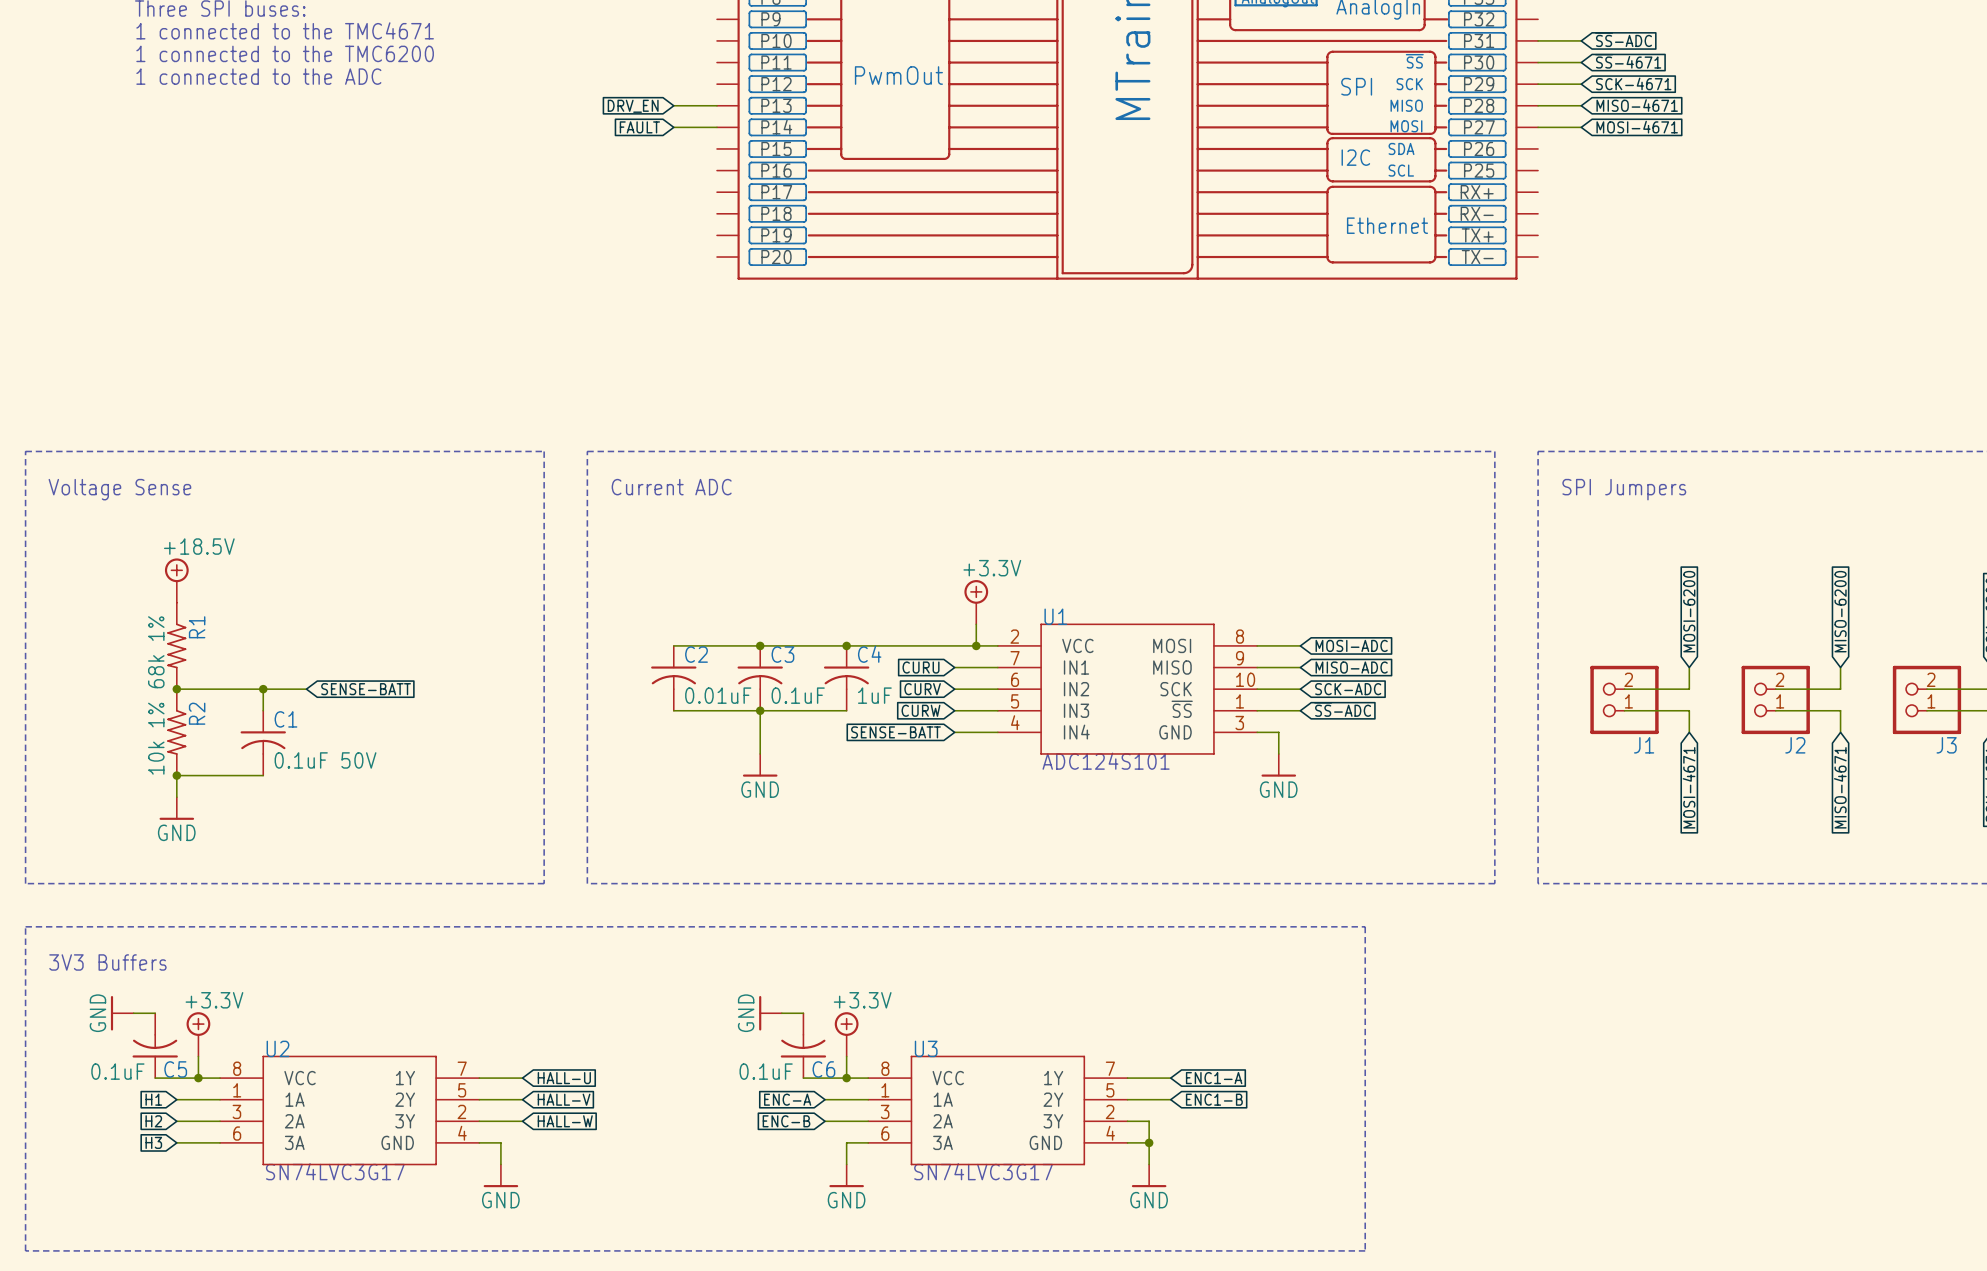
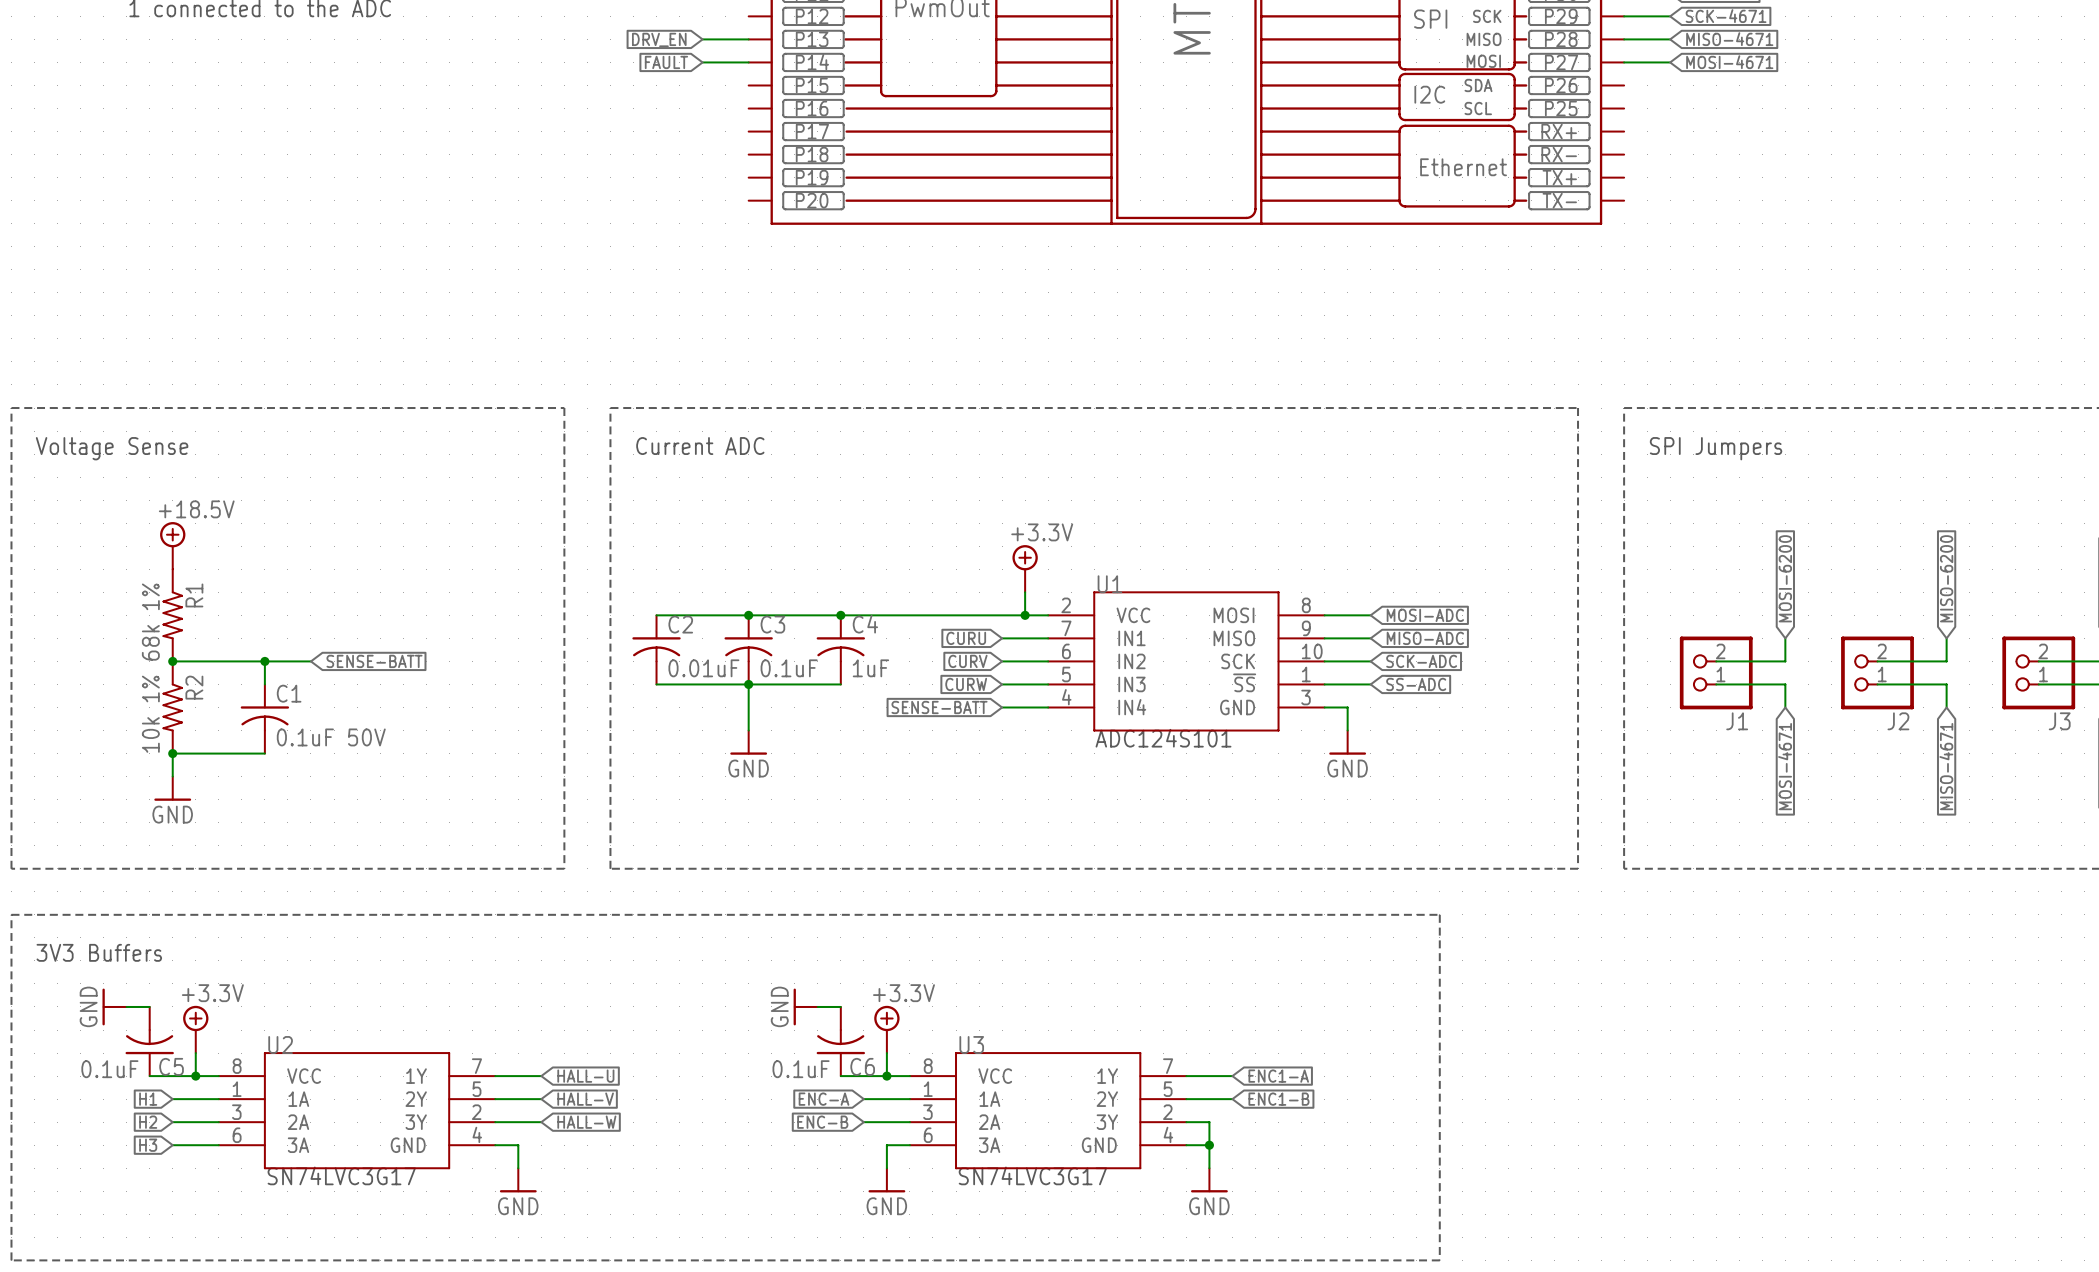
wire: none -> (656, 615) (702, 615)
junction: none -> (748, 615)
junction: (760, 645) -> none
junction: none -> (840, 615)
junction: (846, 645) -> none
C2 position: (673, 678) -> (656, 649)
C3 position: (760, 678) -> (748, 649)
C4 position: (846, 678) -> (840, 649)
junction: none -> (748, 684)
wire: (760, 710) (760, 753) -> (748, 684) (748, 730)
junction: (760, 710) -> none
wire: (803, 710) (846, 710) -> (656, 684) (702, 684)
power symbol position: GND (760, 765) -> GND (748, 742)

